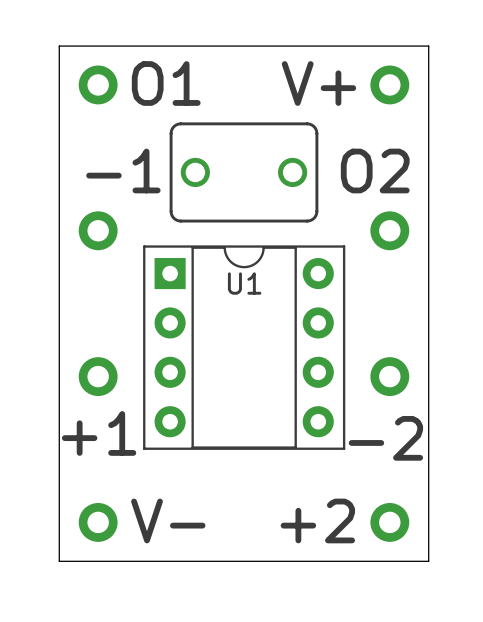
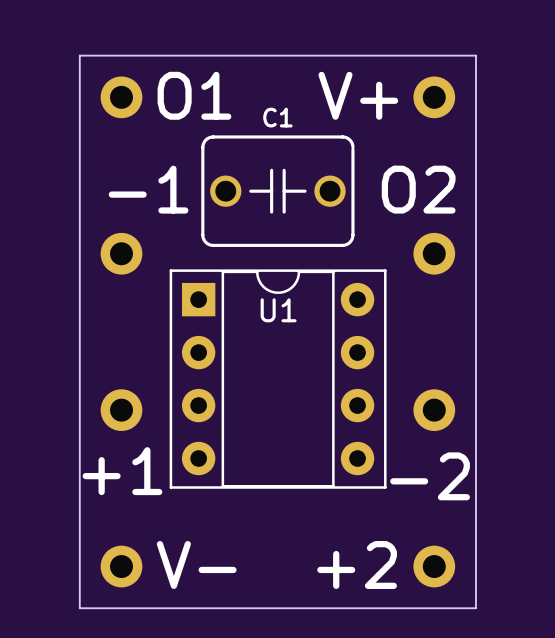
part: (243, 172) -> none
C1: none -> (277, 191)

